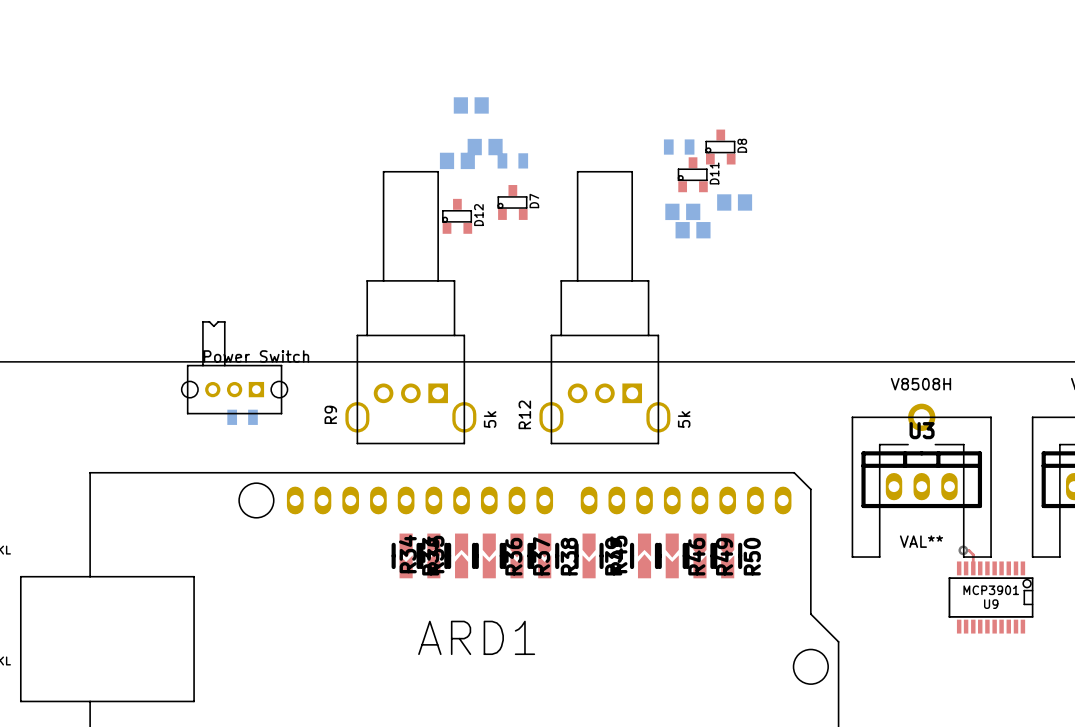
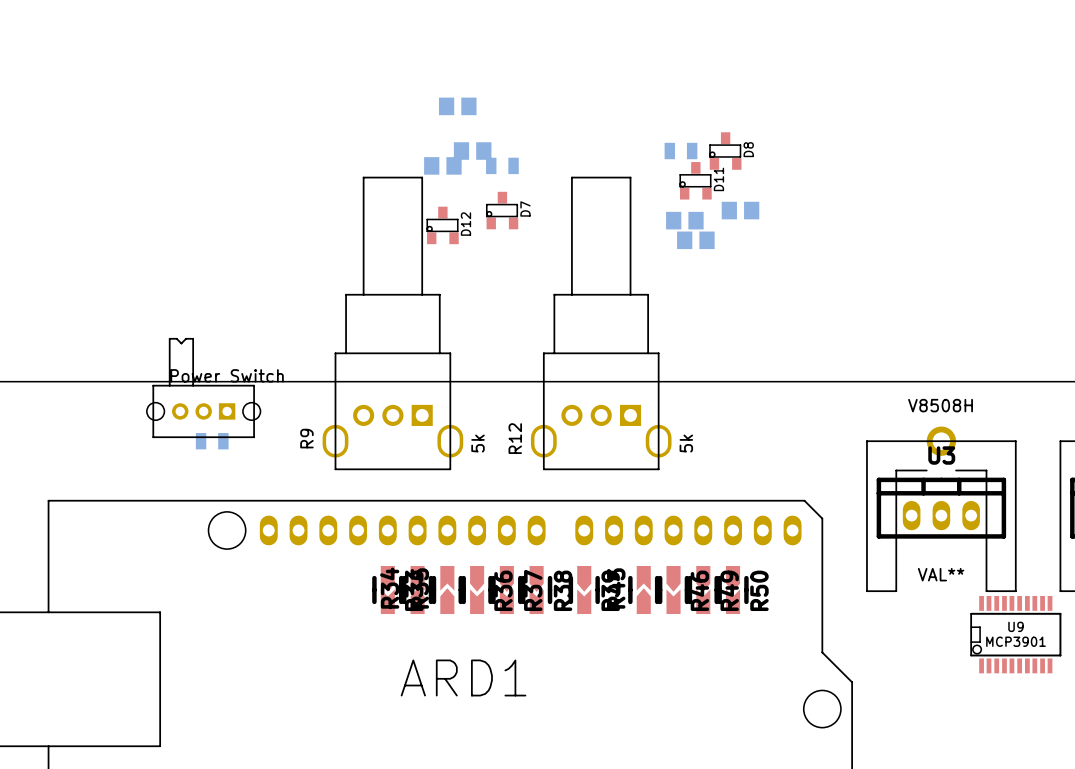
top track: (963, 550) (968, 550) (973, 554) (973, 568) -> none
via: (963, 550) -> none
U9 rotation: 0° (991, 597) -> 180° (1015, 634)

